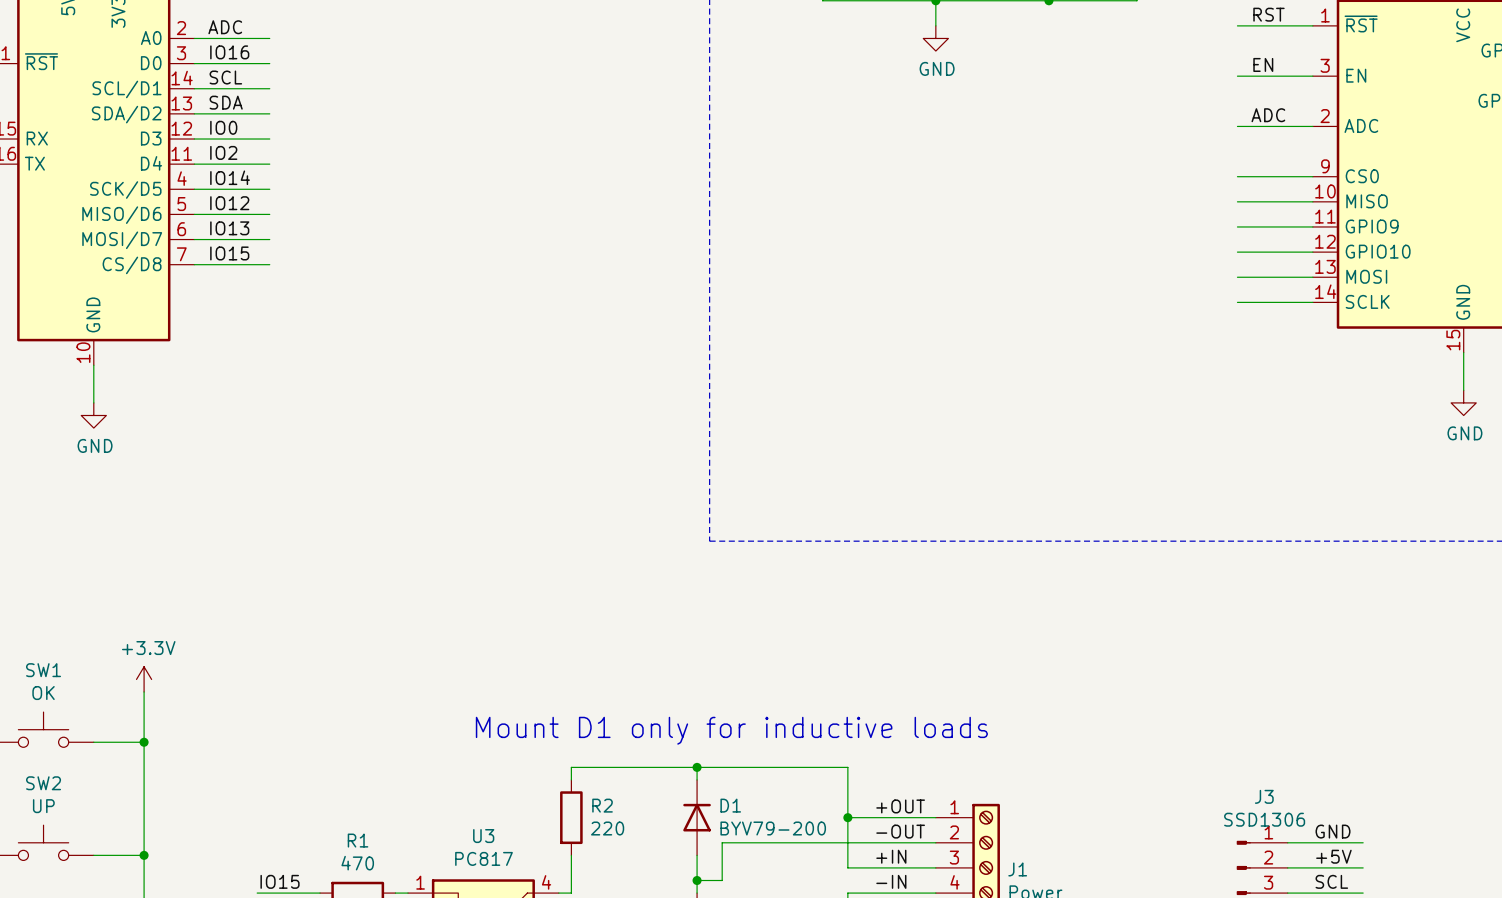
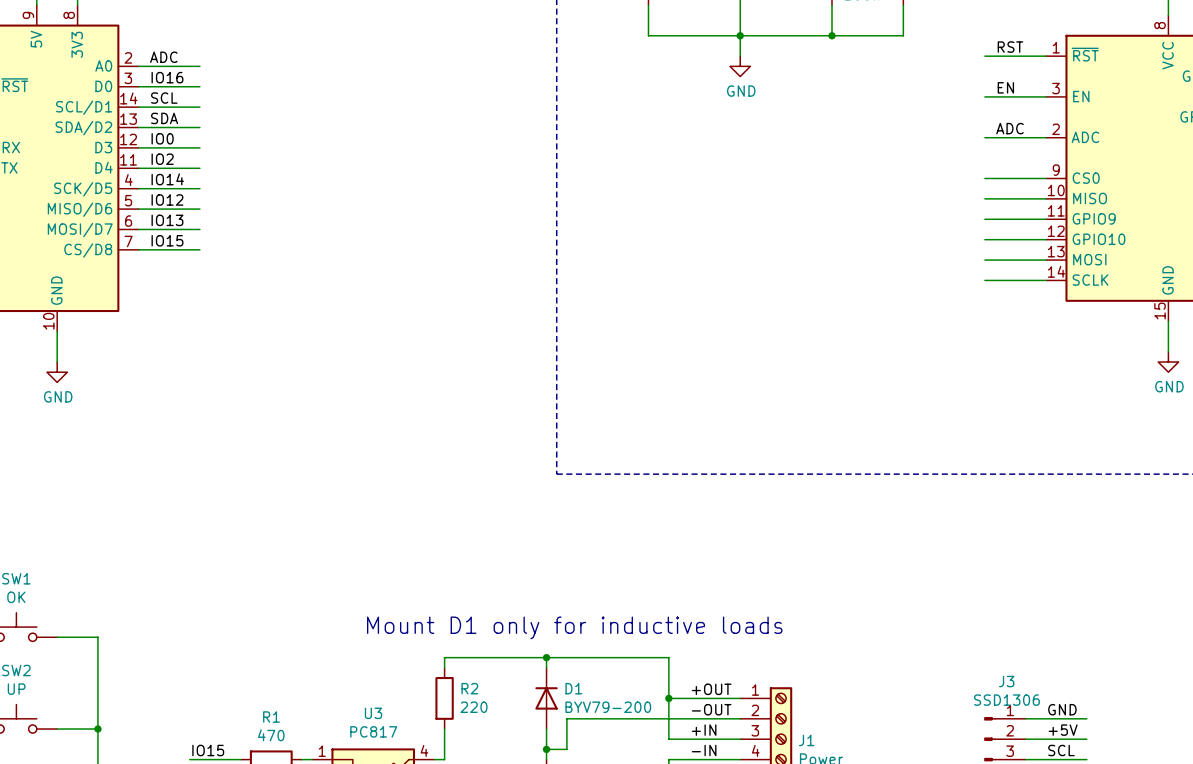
power symbol: +3.3V (144, 679) -> none
wire: (144, 691) (144, 742) -> none
junction: (144, 742) -> none

